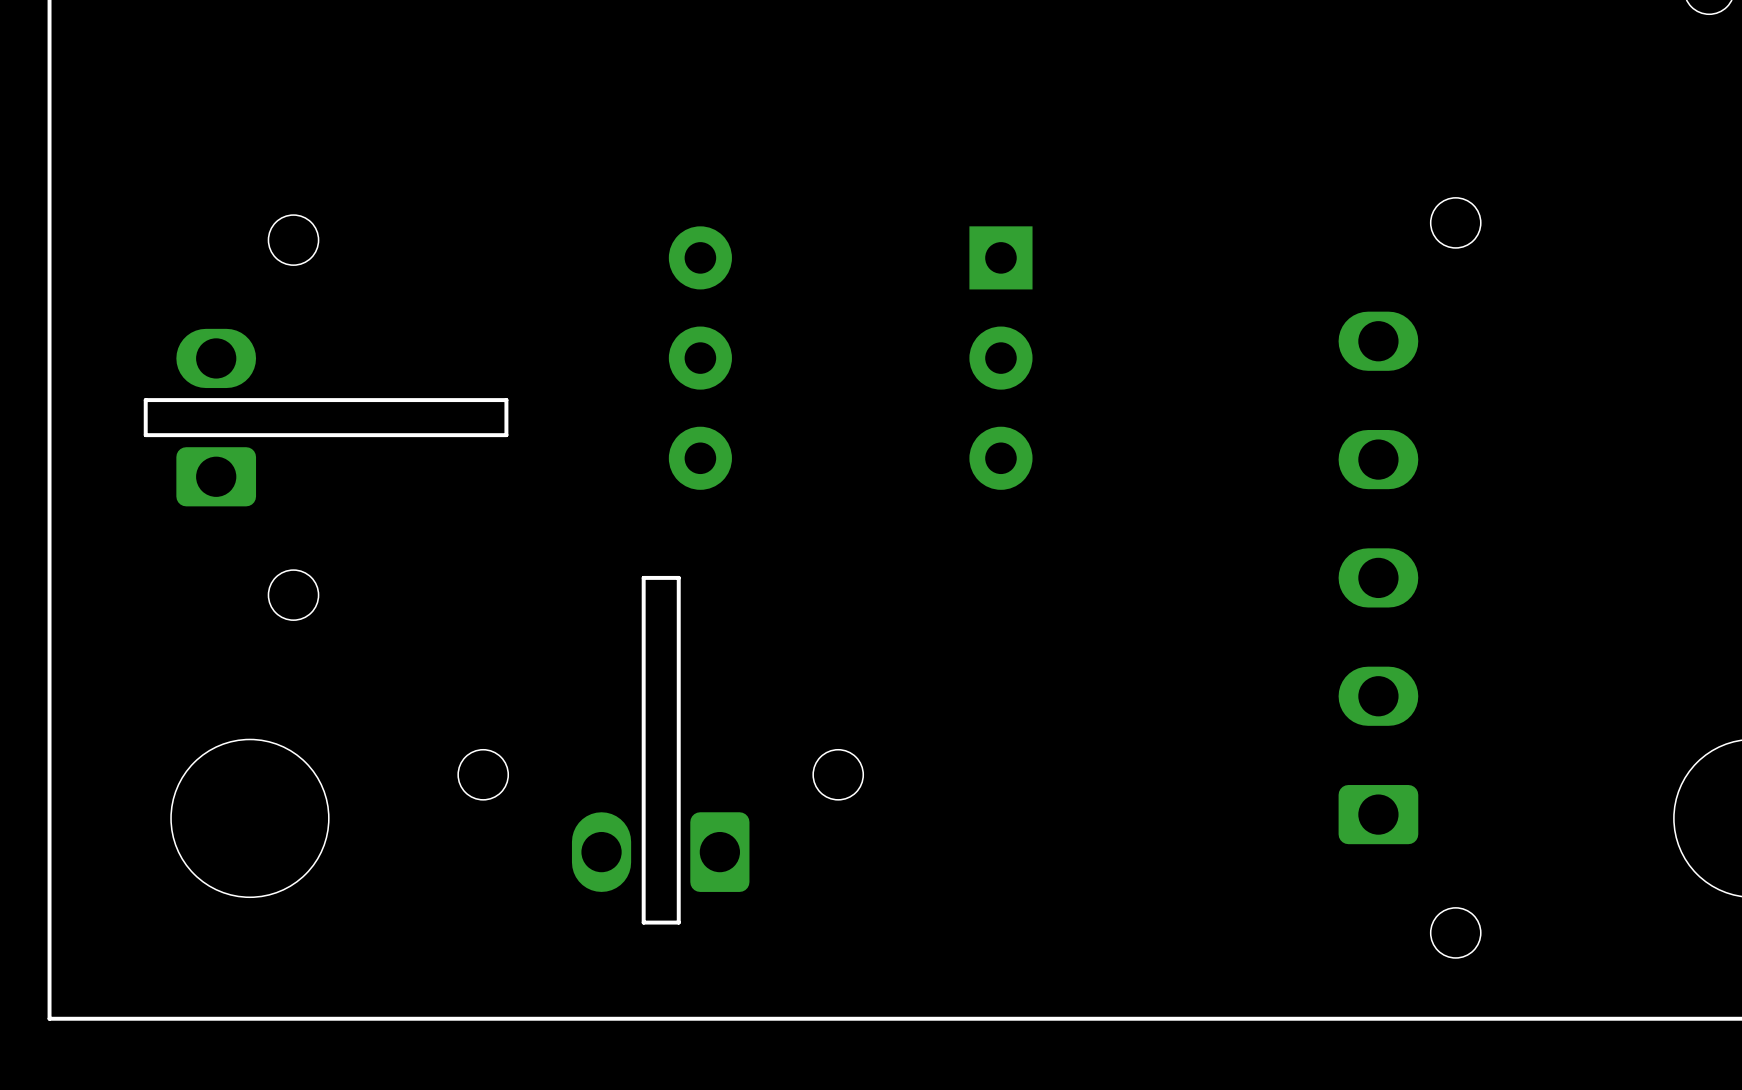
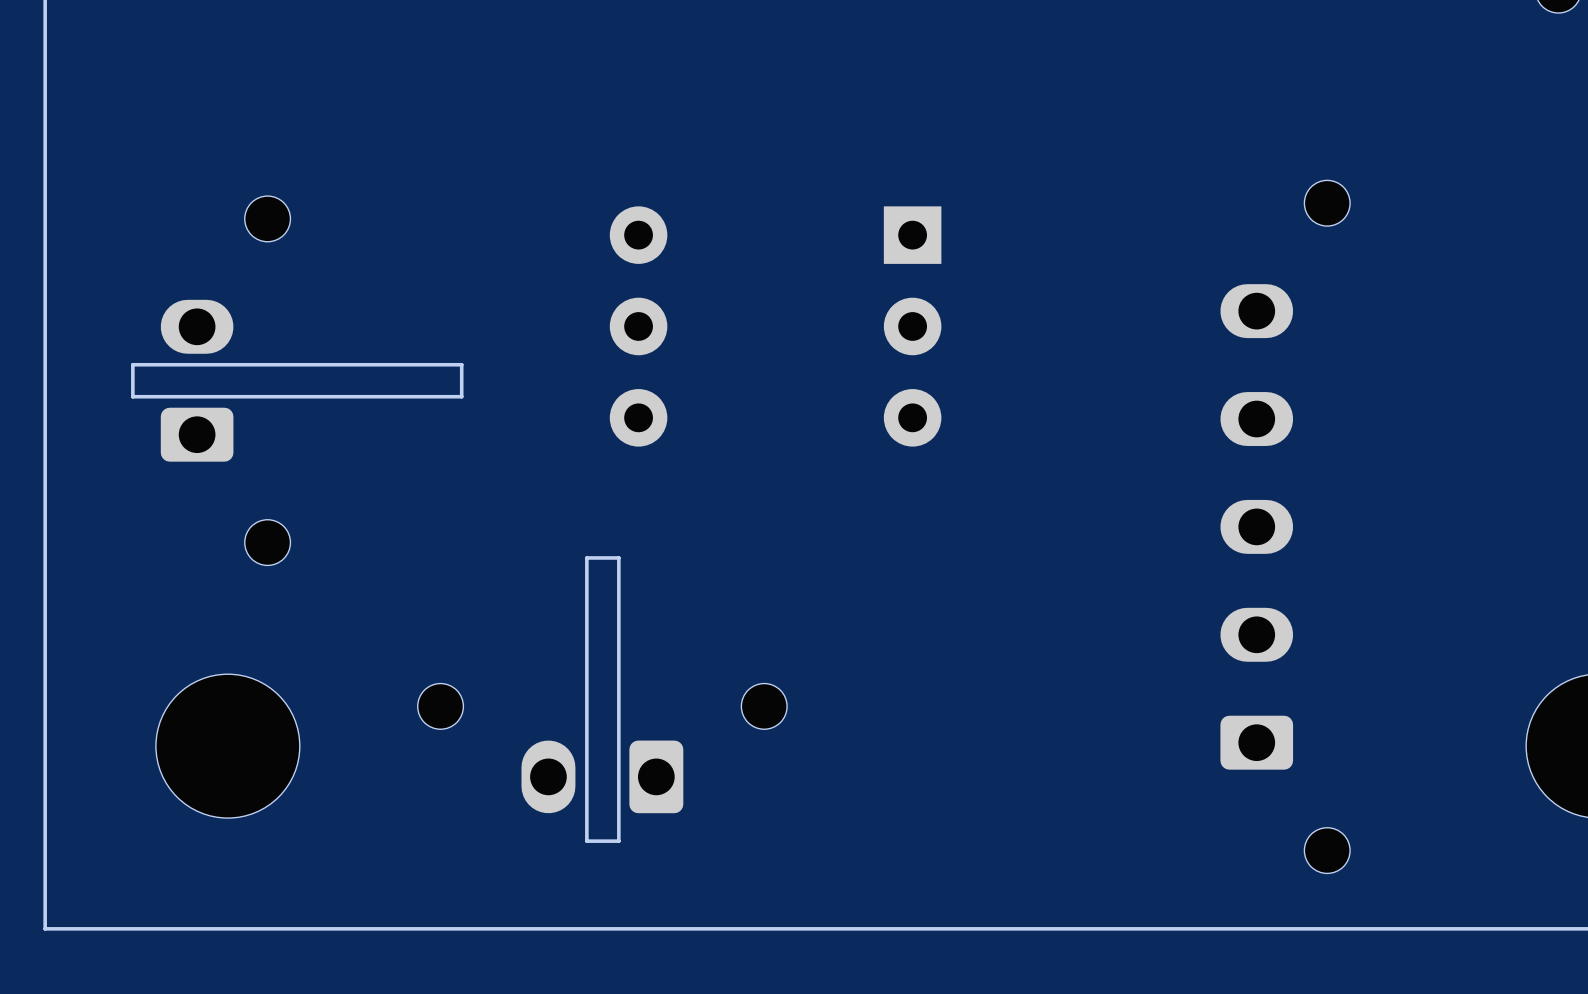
board edge: (678, 611) (678, 577) (643, 577) (643, 611) -> (618, 557) (586, 557)

